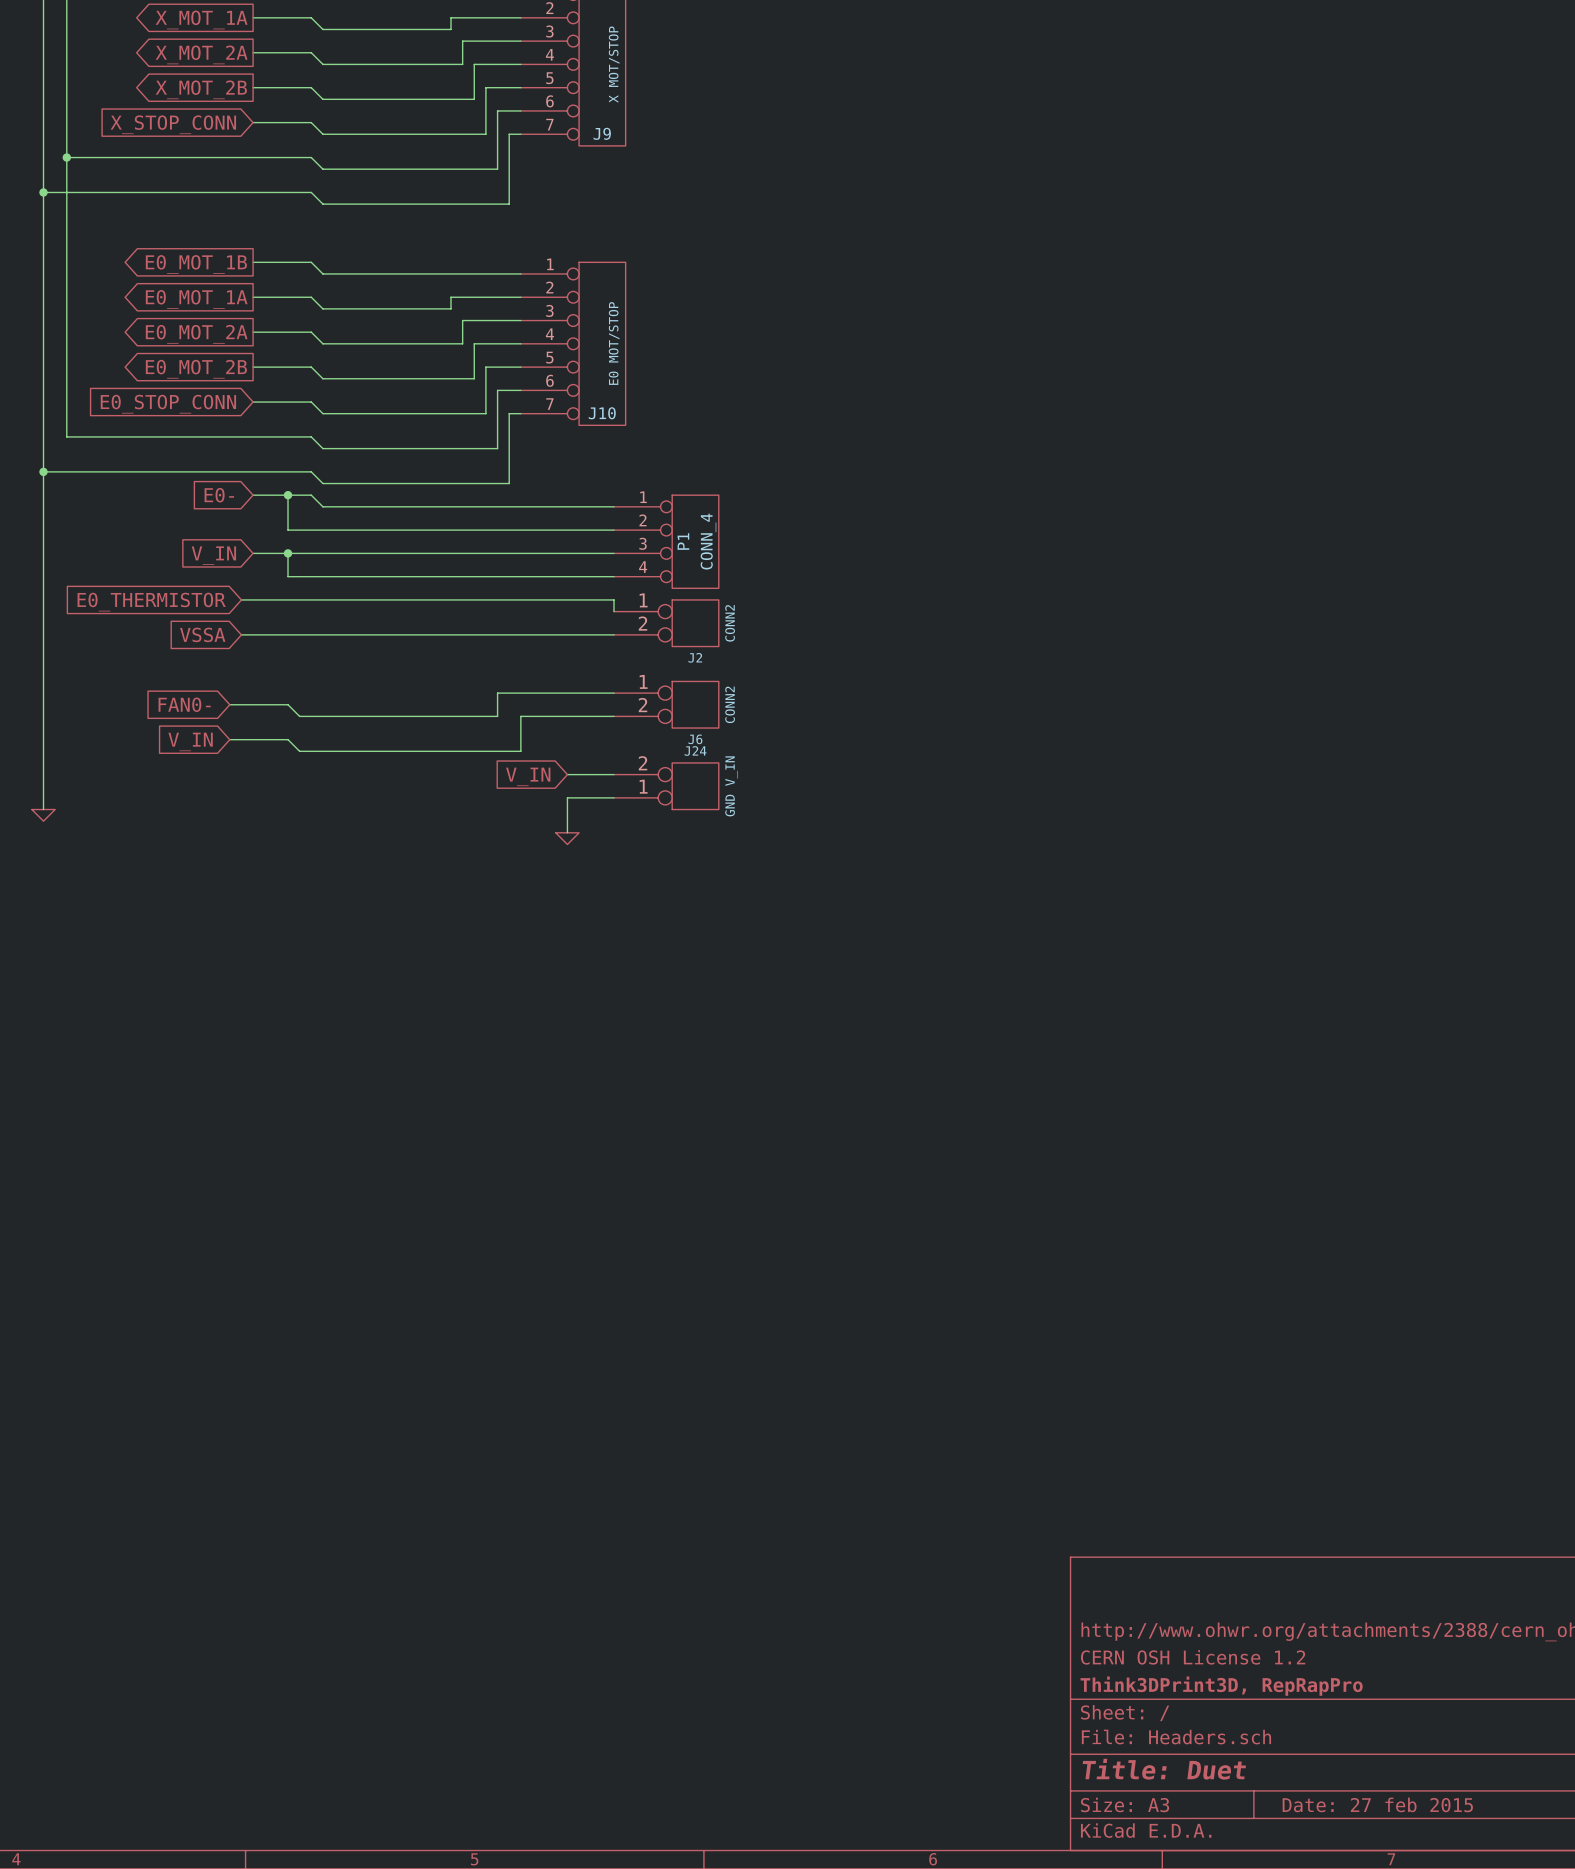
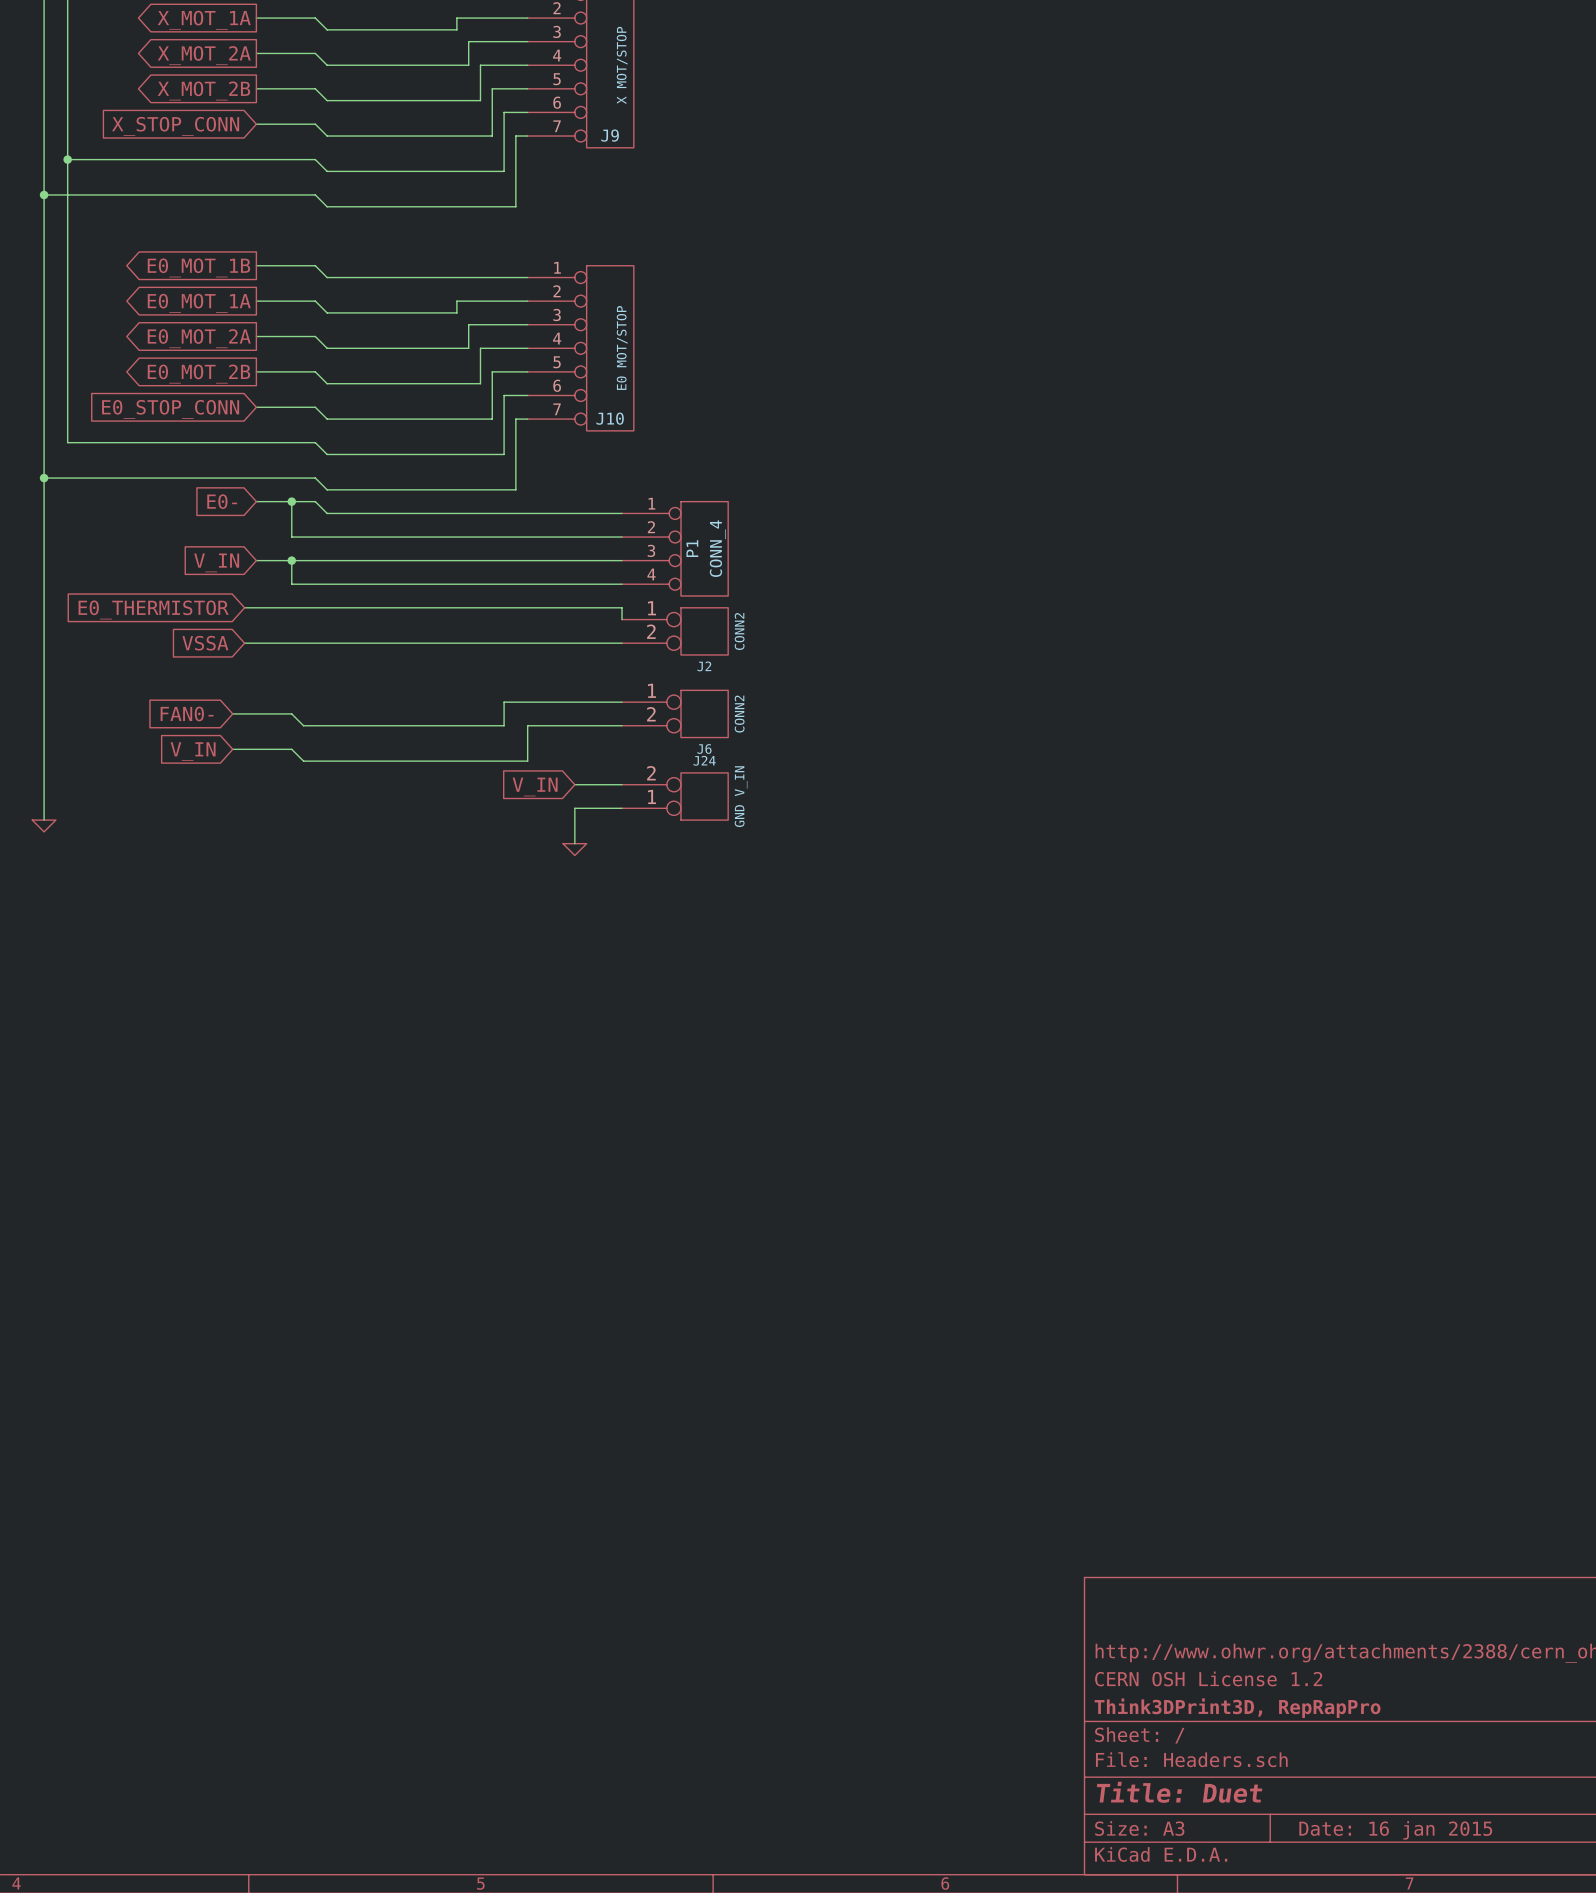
title block: Date: 27 feb 2015 (1377, 1804) -> Date: 16 jan 2015 (1395, 1830)

